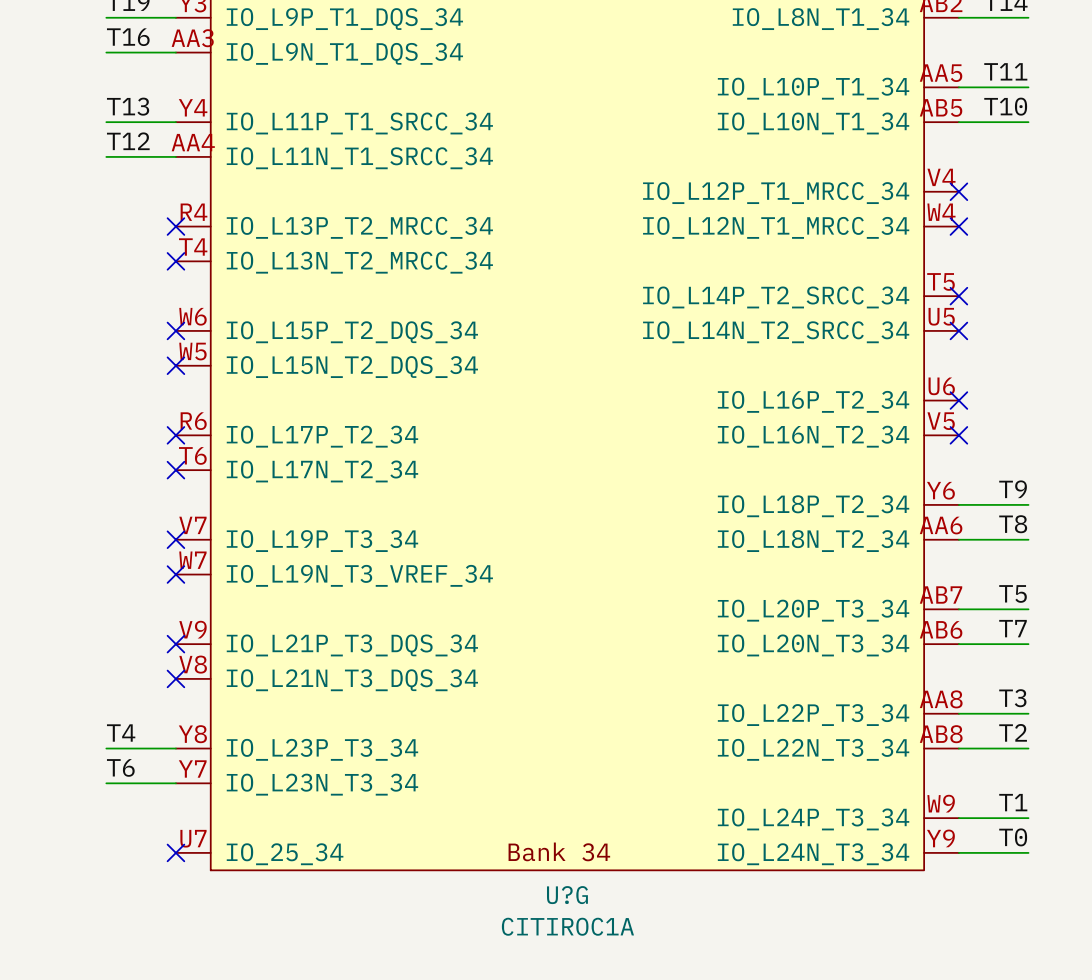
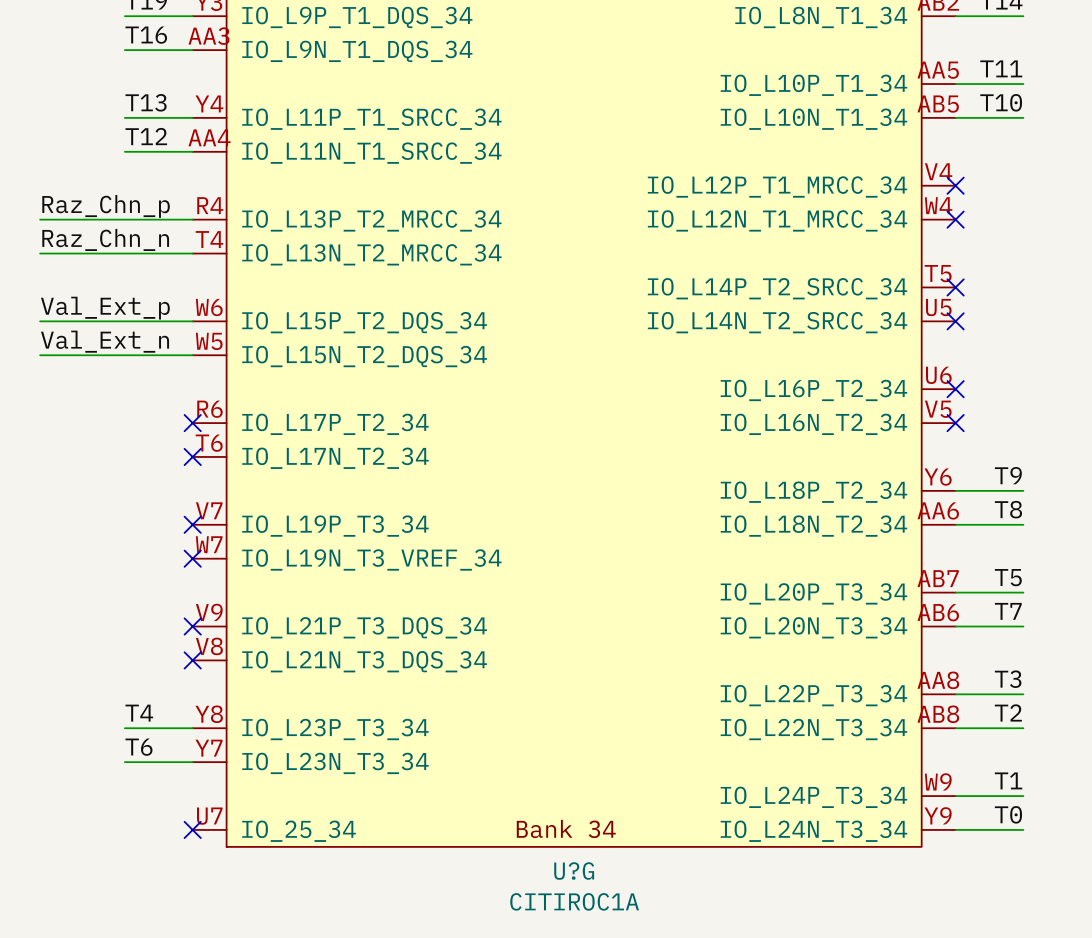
label: none -> Raz_Chn_p (106, 206)
wire: none -> (40, 219) (192, 219)
no-connect mark: (175, 226) -> none
label: none -> Raz_Chn_n (105, 239)
wire: none -> (40, 253) (192, 253)
no-connect mark: (175, 261) -> none
label: none -> Val_Ext_p (105, 308)
wire: none -> (40, 321) (192, 321)
no-connect mark: (175, 330) -> none
label: none -> Val_Ext_n (105, 341)
wire: none -> (40, 355) (192, 355)
no-connect mark: (175, 365) -> none

